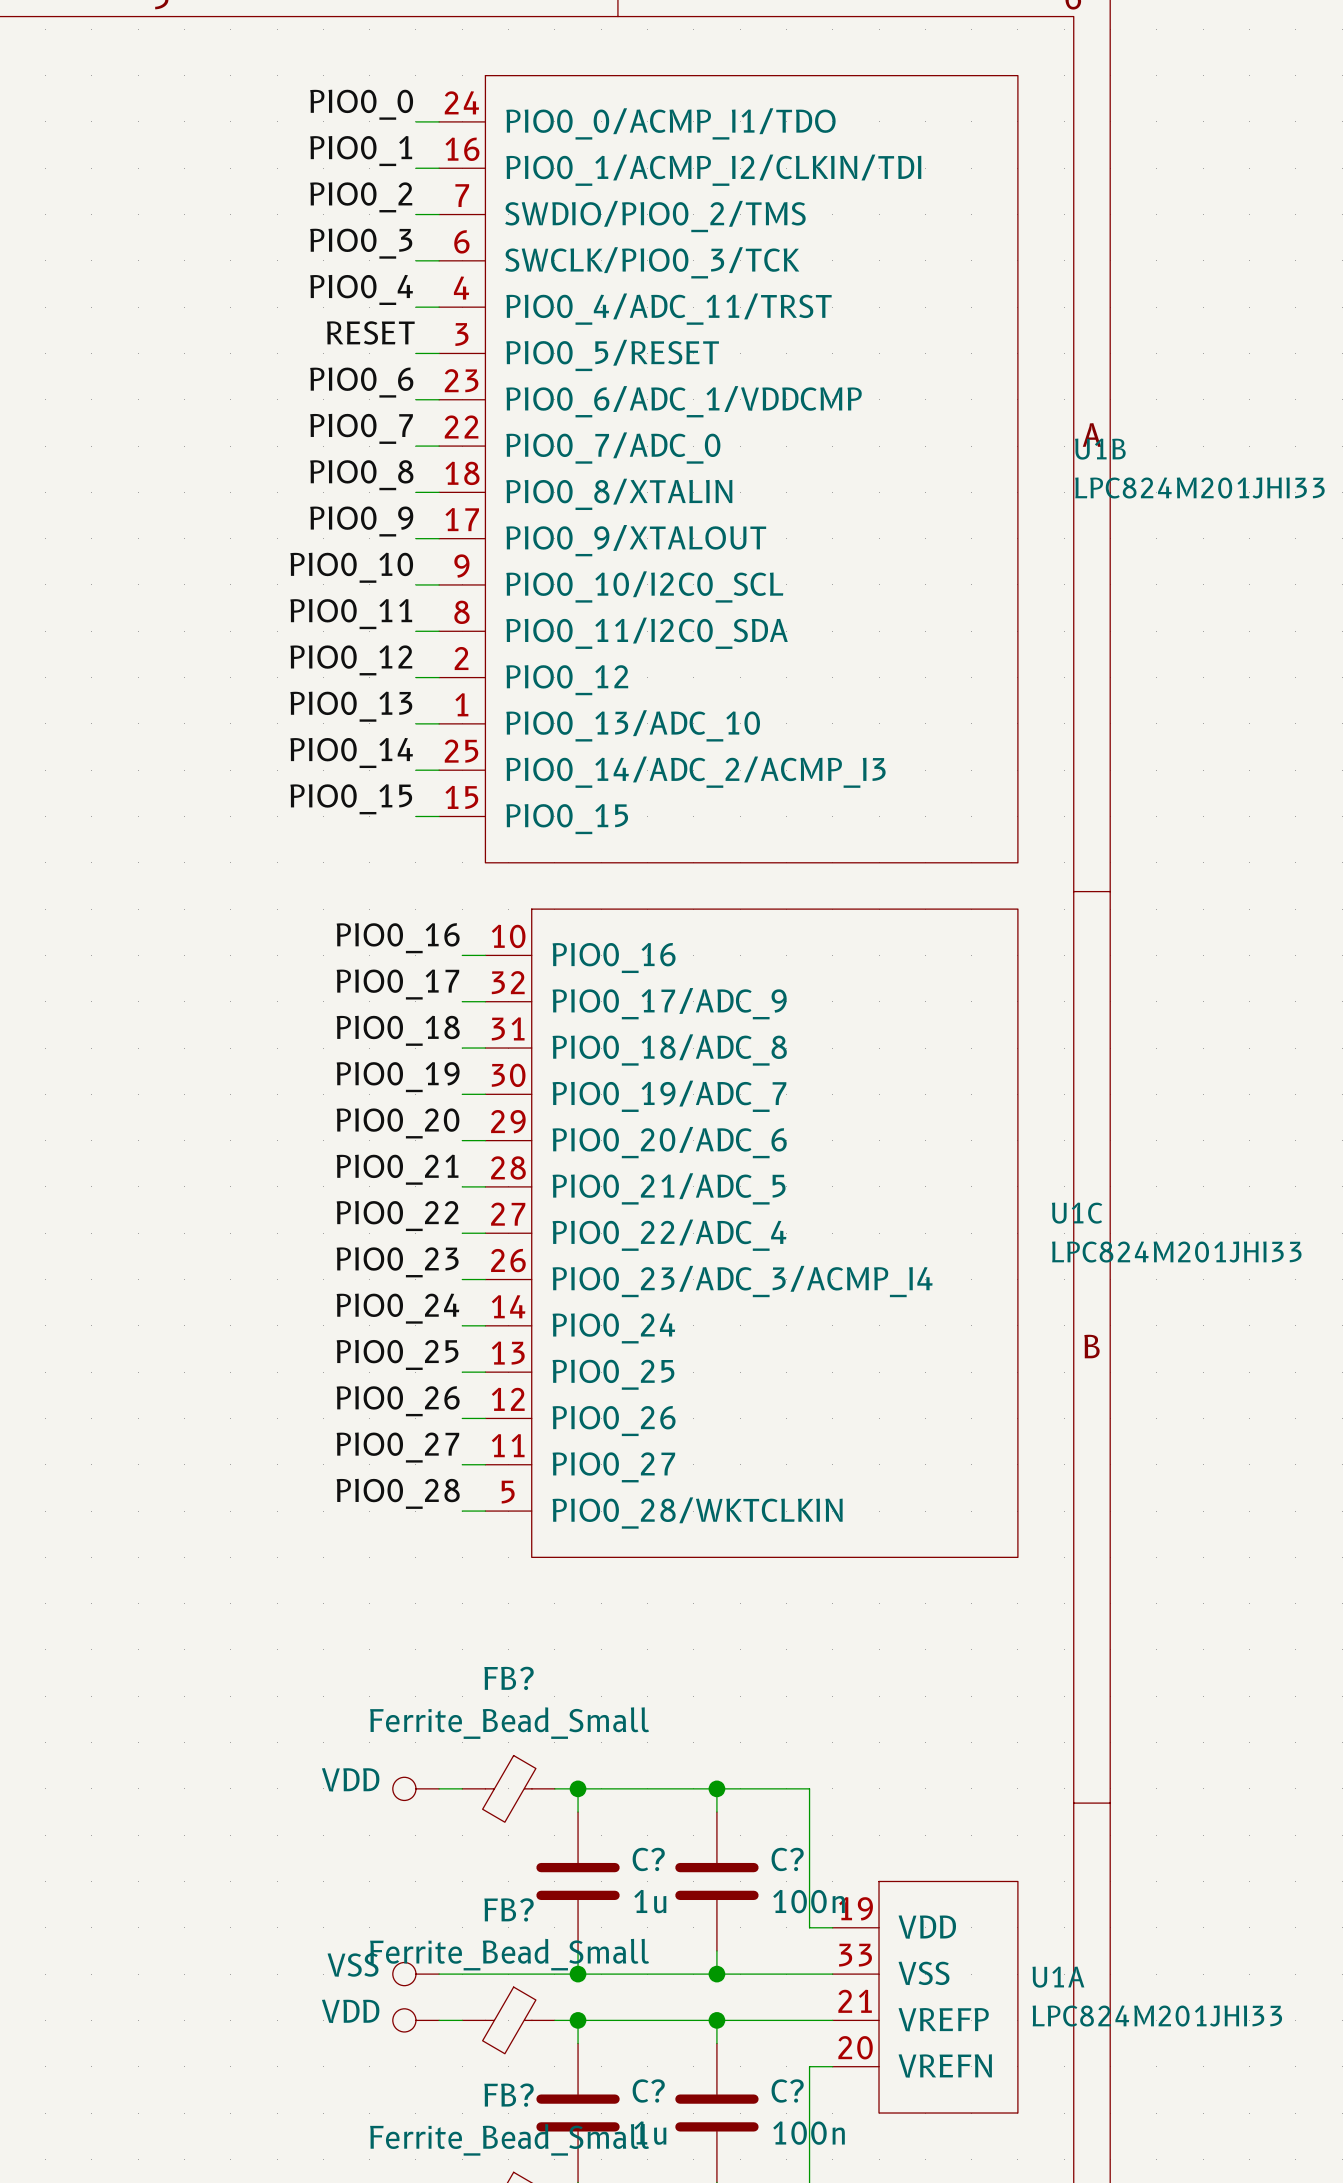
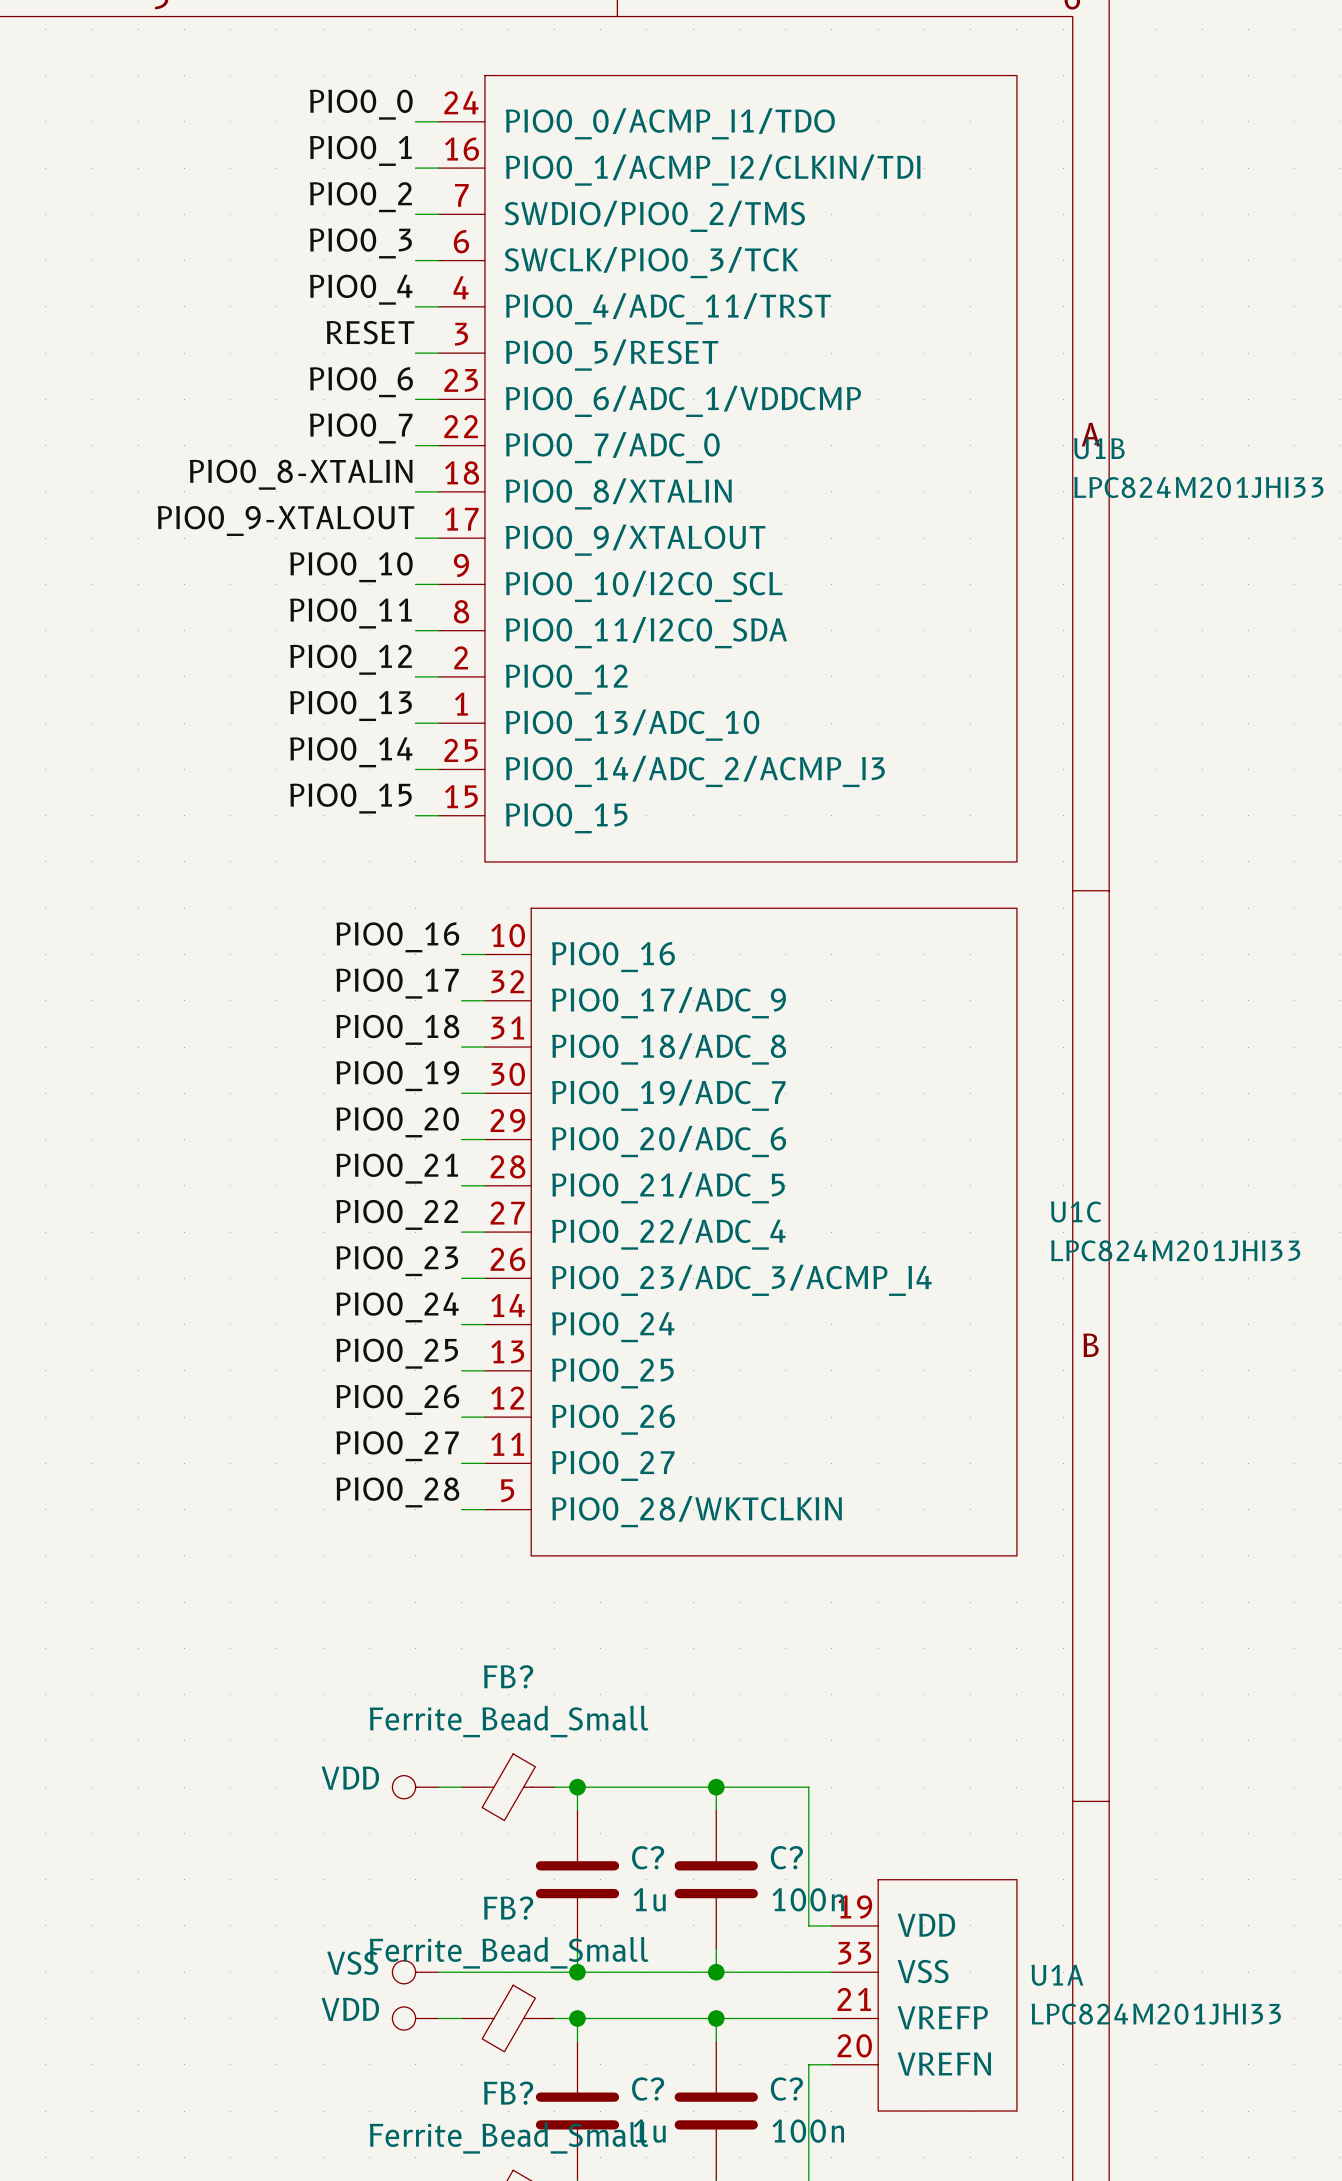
label: PIO0_8 (361, 475) -> PIO0_8-XTALIN (301, 474)
label: PIO0_9 (361, 521) -> PIO0_9-XTALOUT (286, 520)

